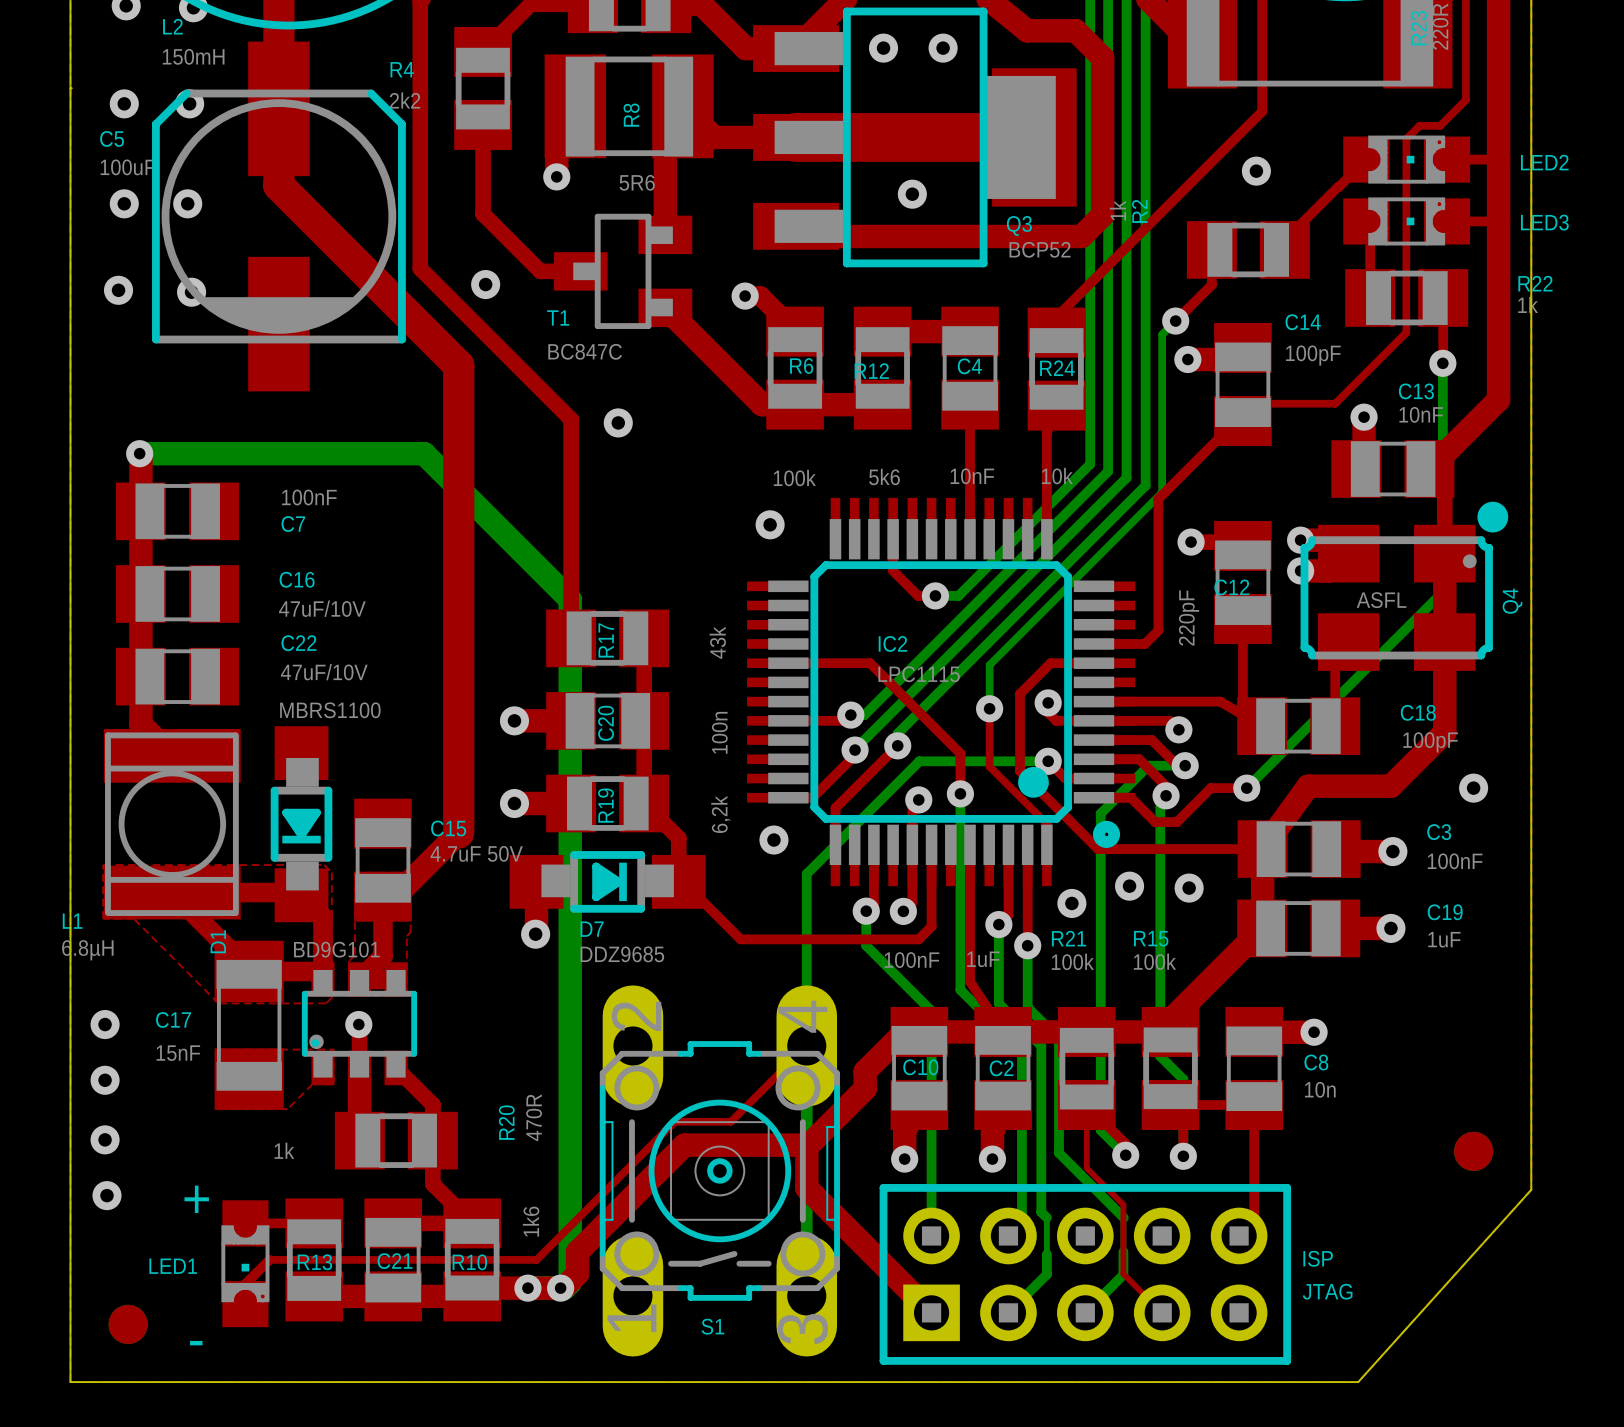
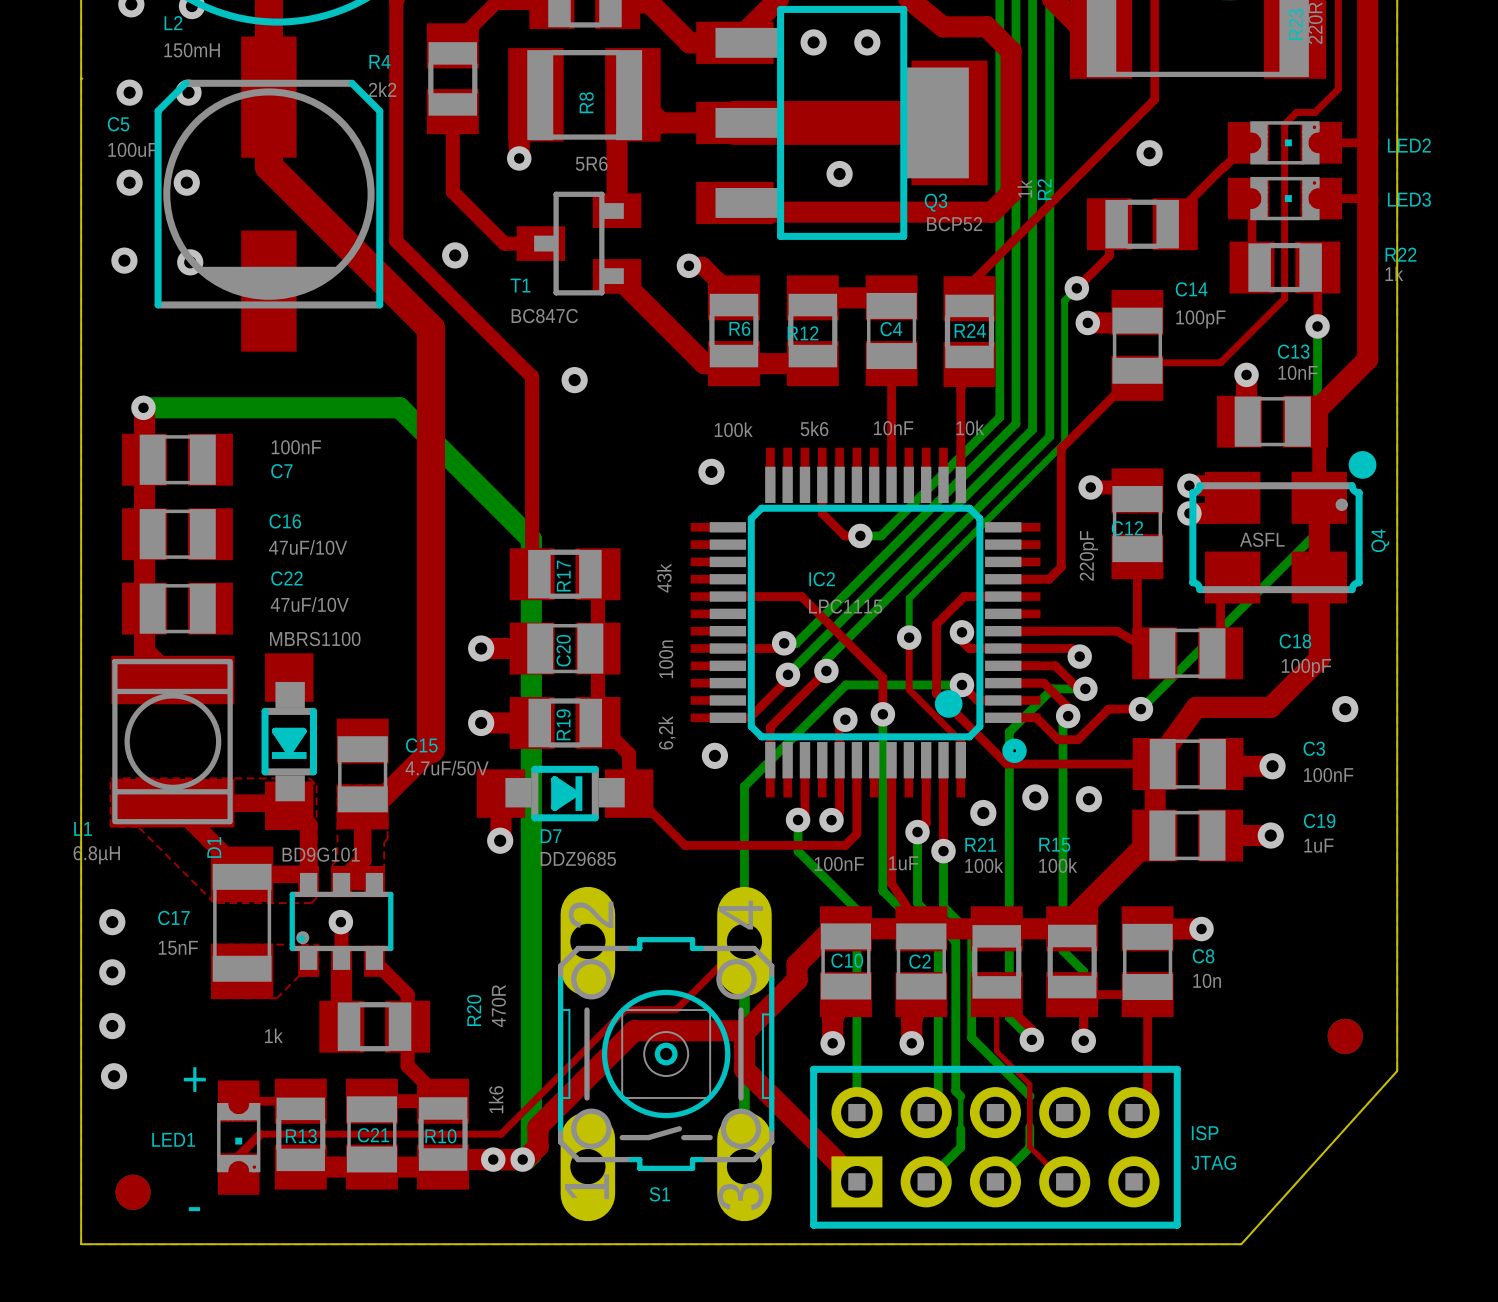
C15 value: 4.7uF 50V (476, 853) -> 4.7uF/50V (447, 768)

